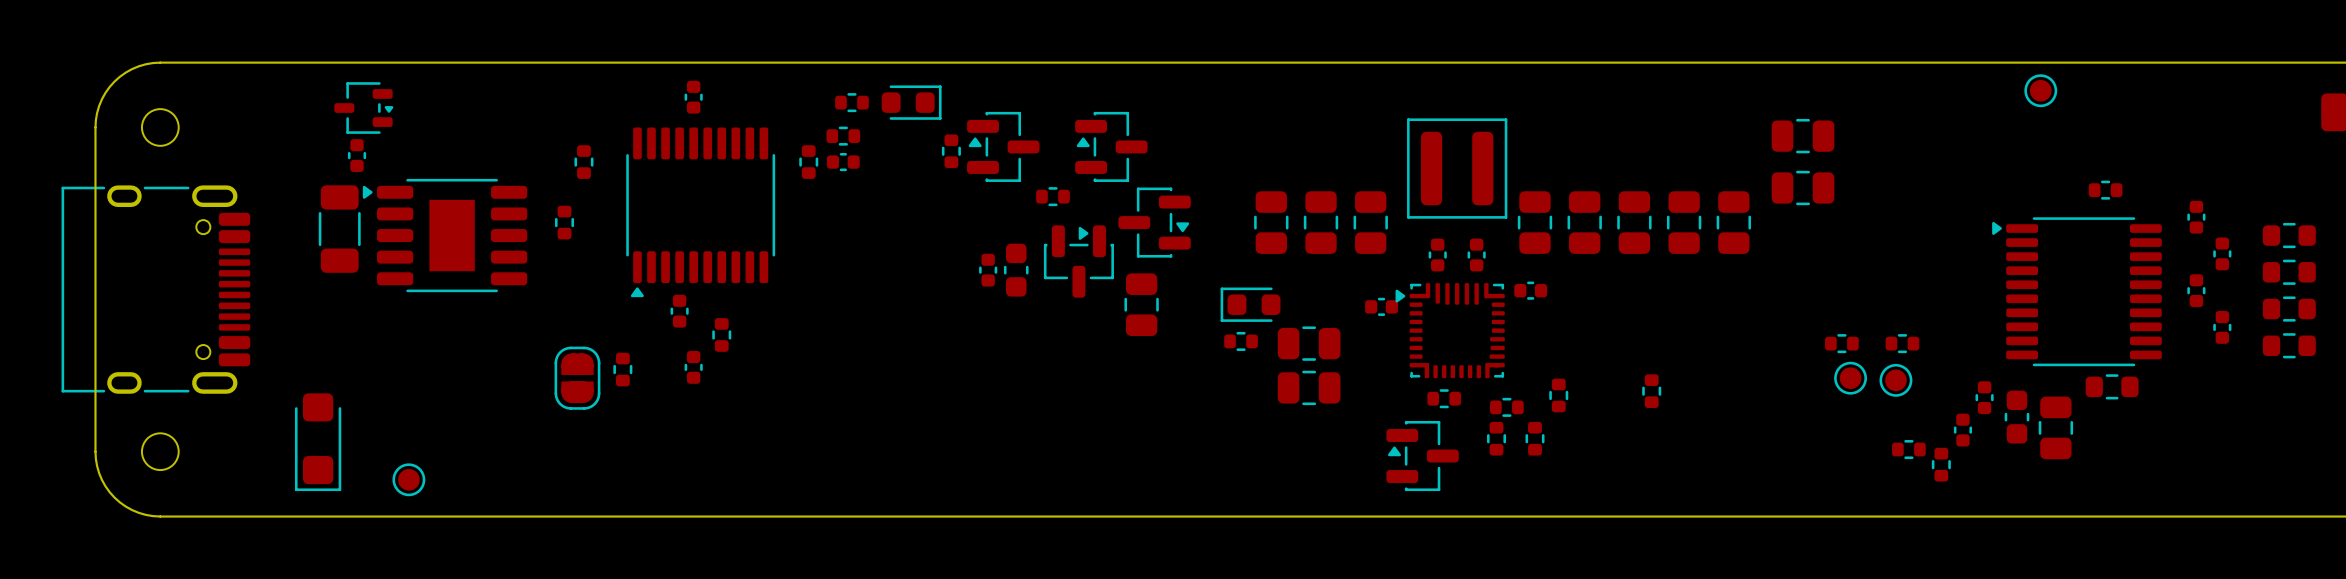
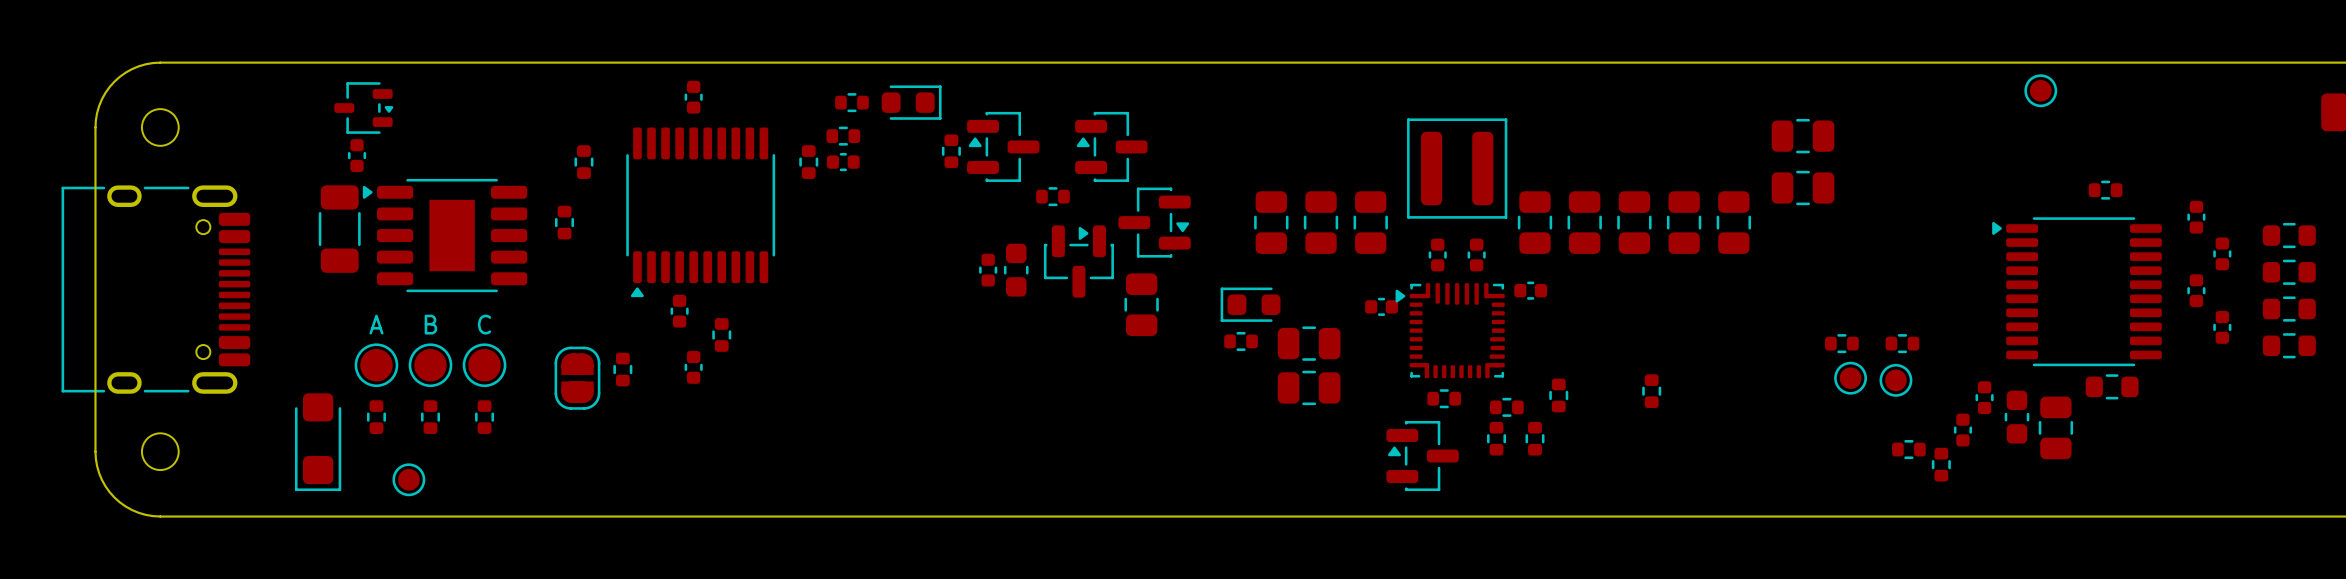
text: none -> A (376, 324)
text: none -> B (430, 324)
text: none -> C (484, 324)
part: none -> (376, 365)
part: none -> (430, 365)
part: none -> (484, 365)
part: none -> (376, 417)
part: none -> (430, 417)
part: none -> (484, 417)

